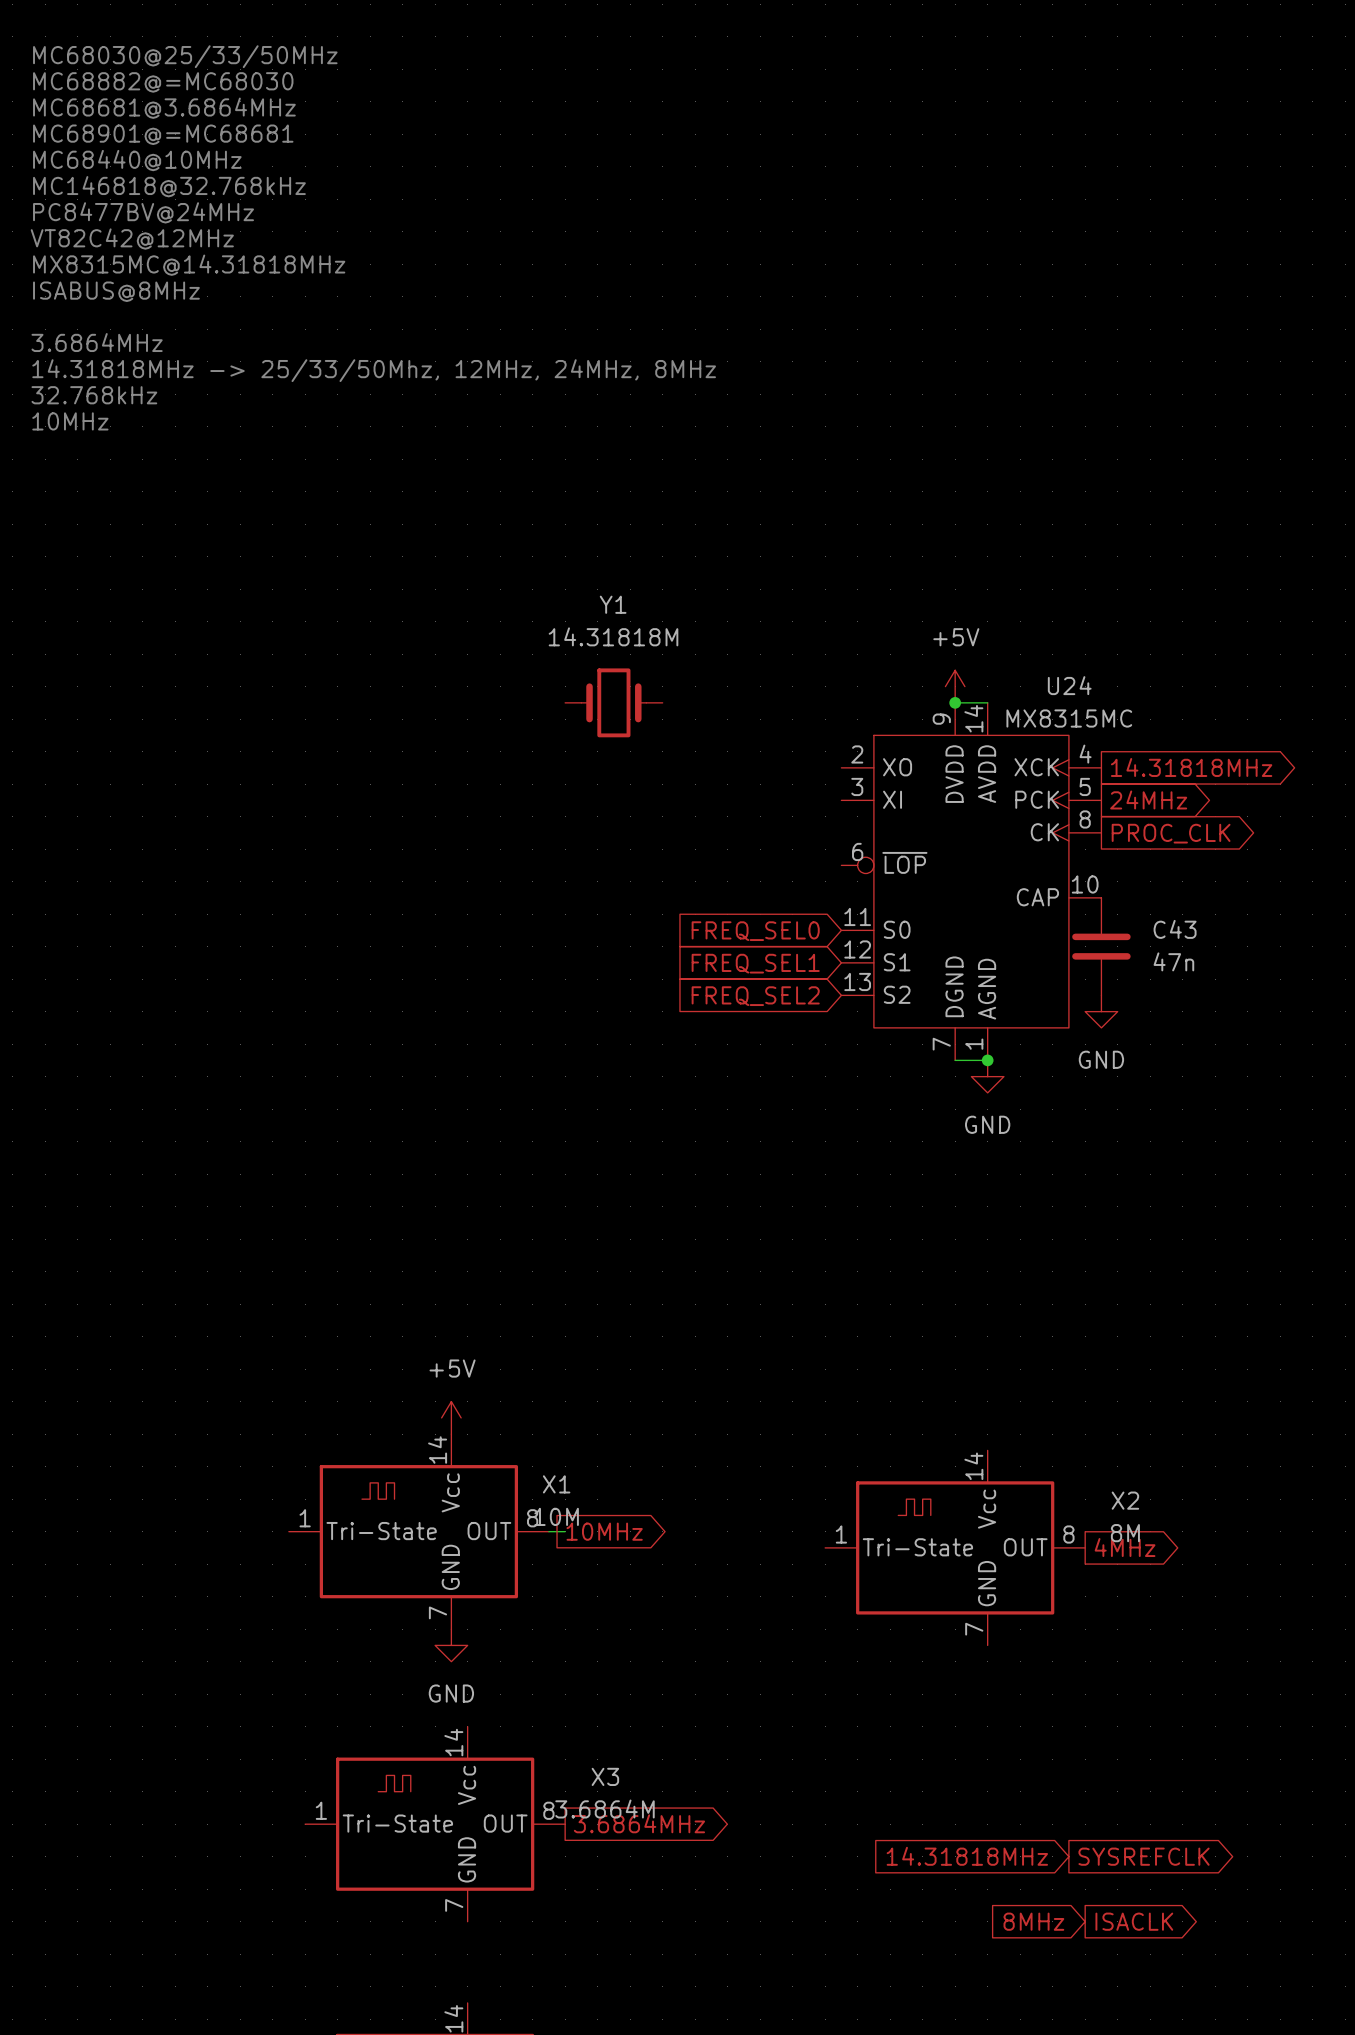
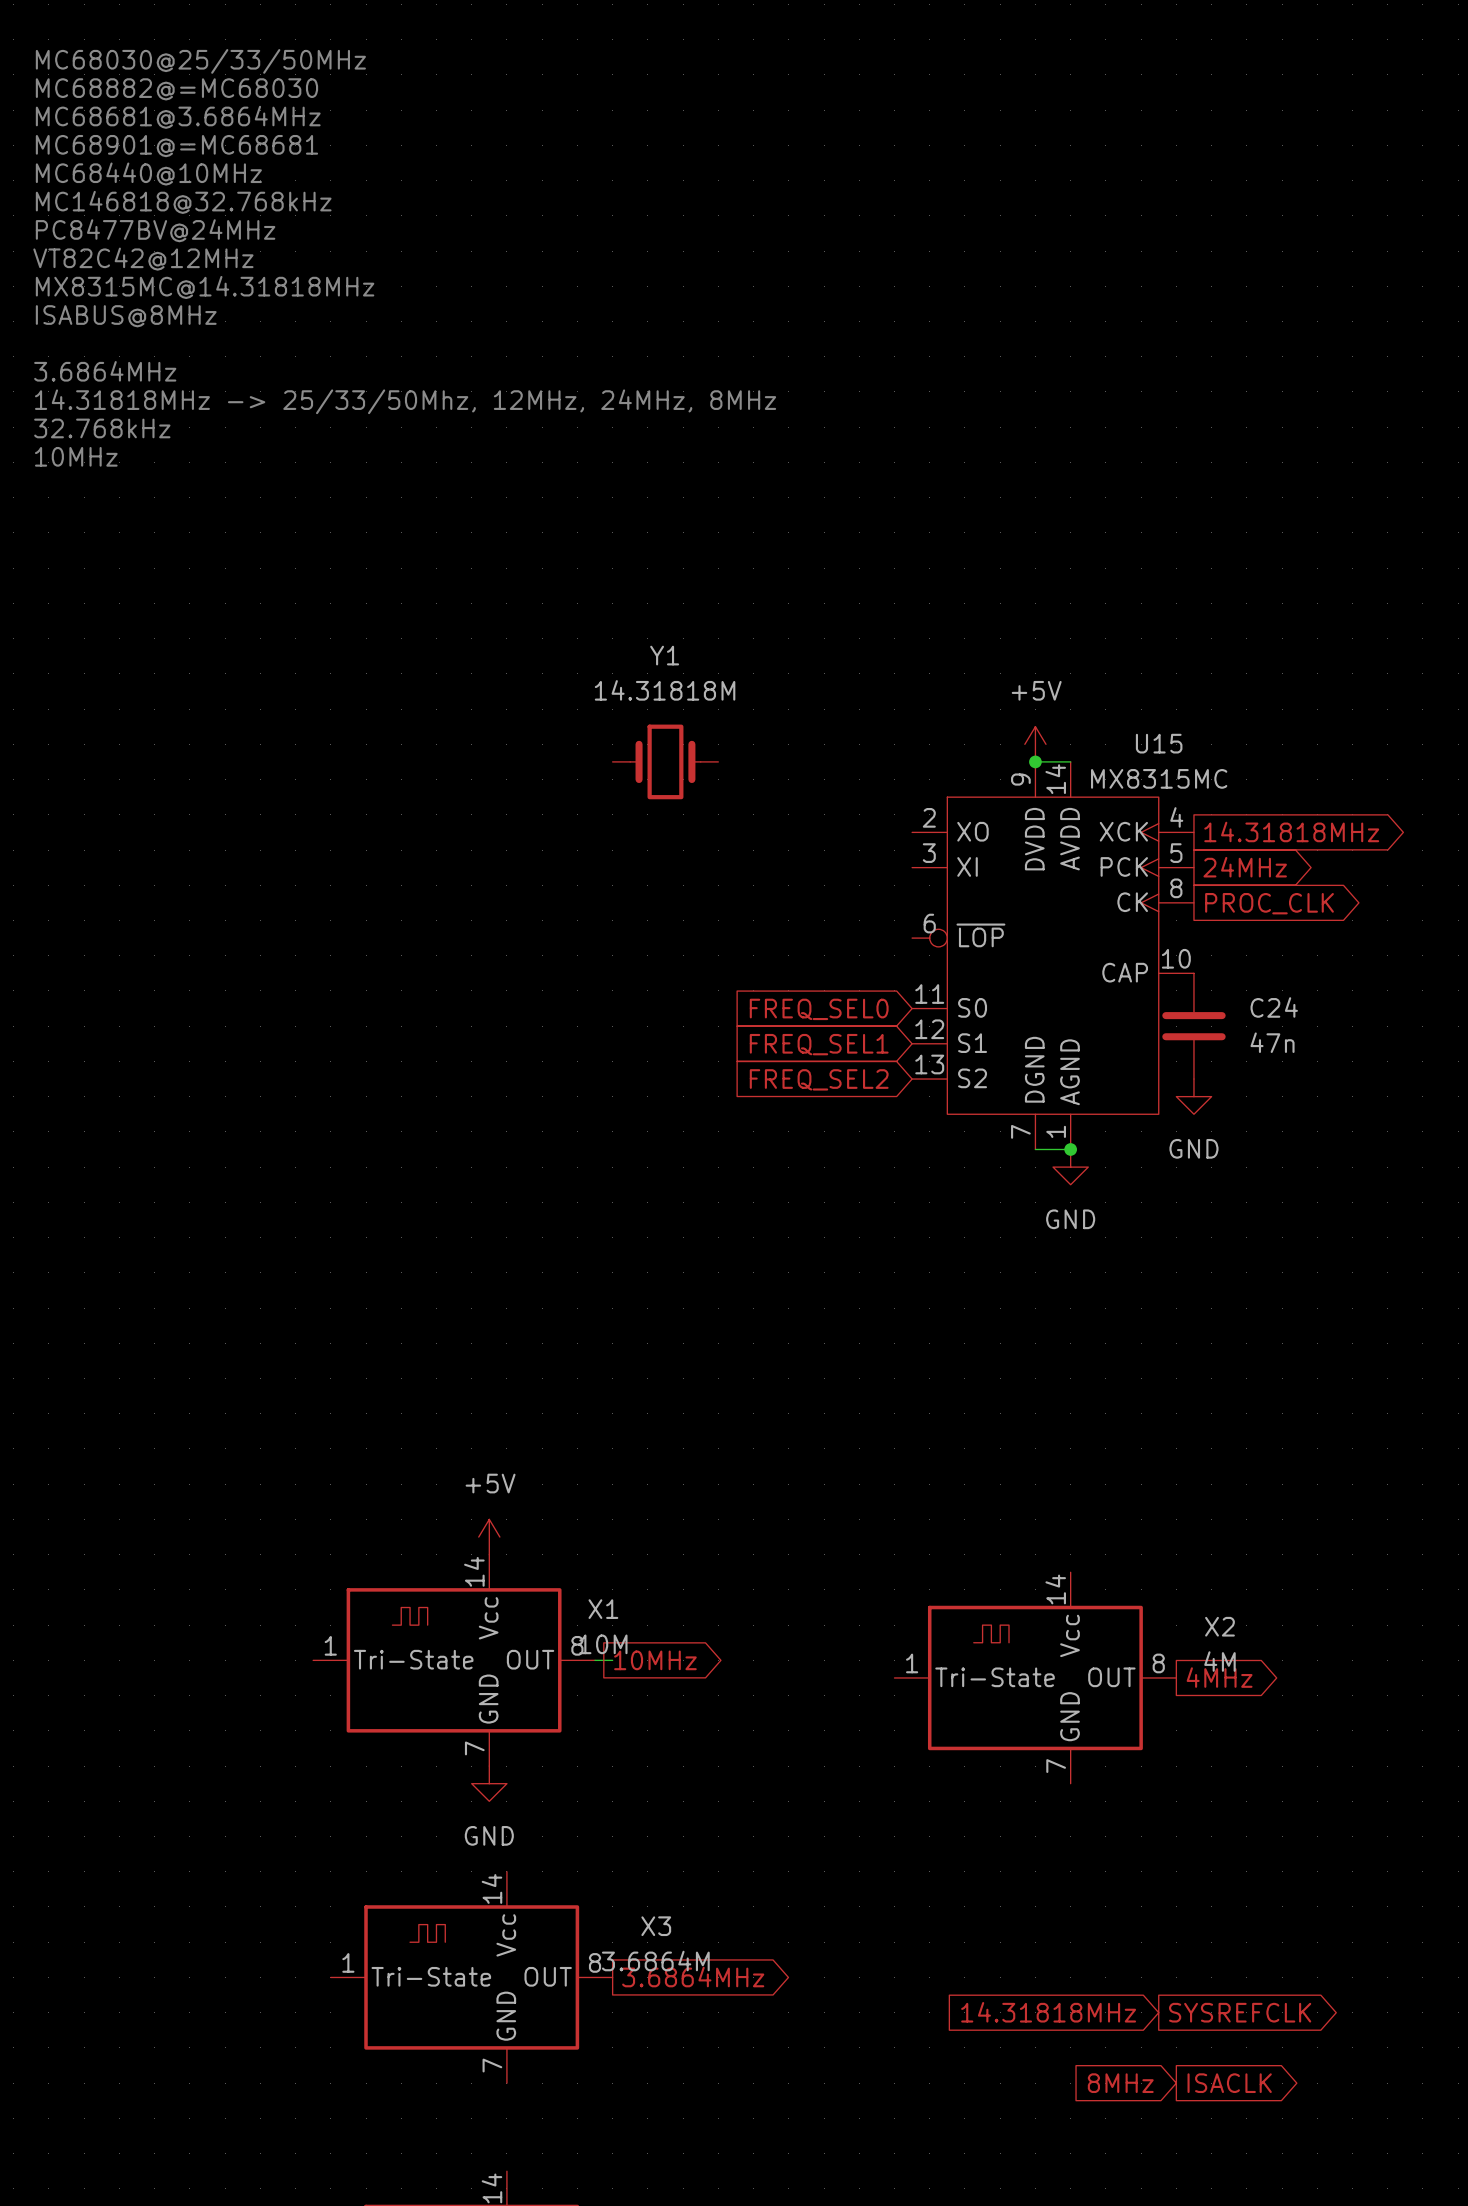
U24 name: U24 (1069, 685) -> U15 (1159, 743)
C43 name: C43 (1175, 929) -> C24 (1274, 1007)
X2 value: 8M (1125, 1533) -> 4M (1219, 1661)

